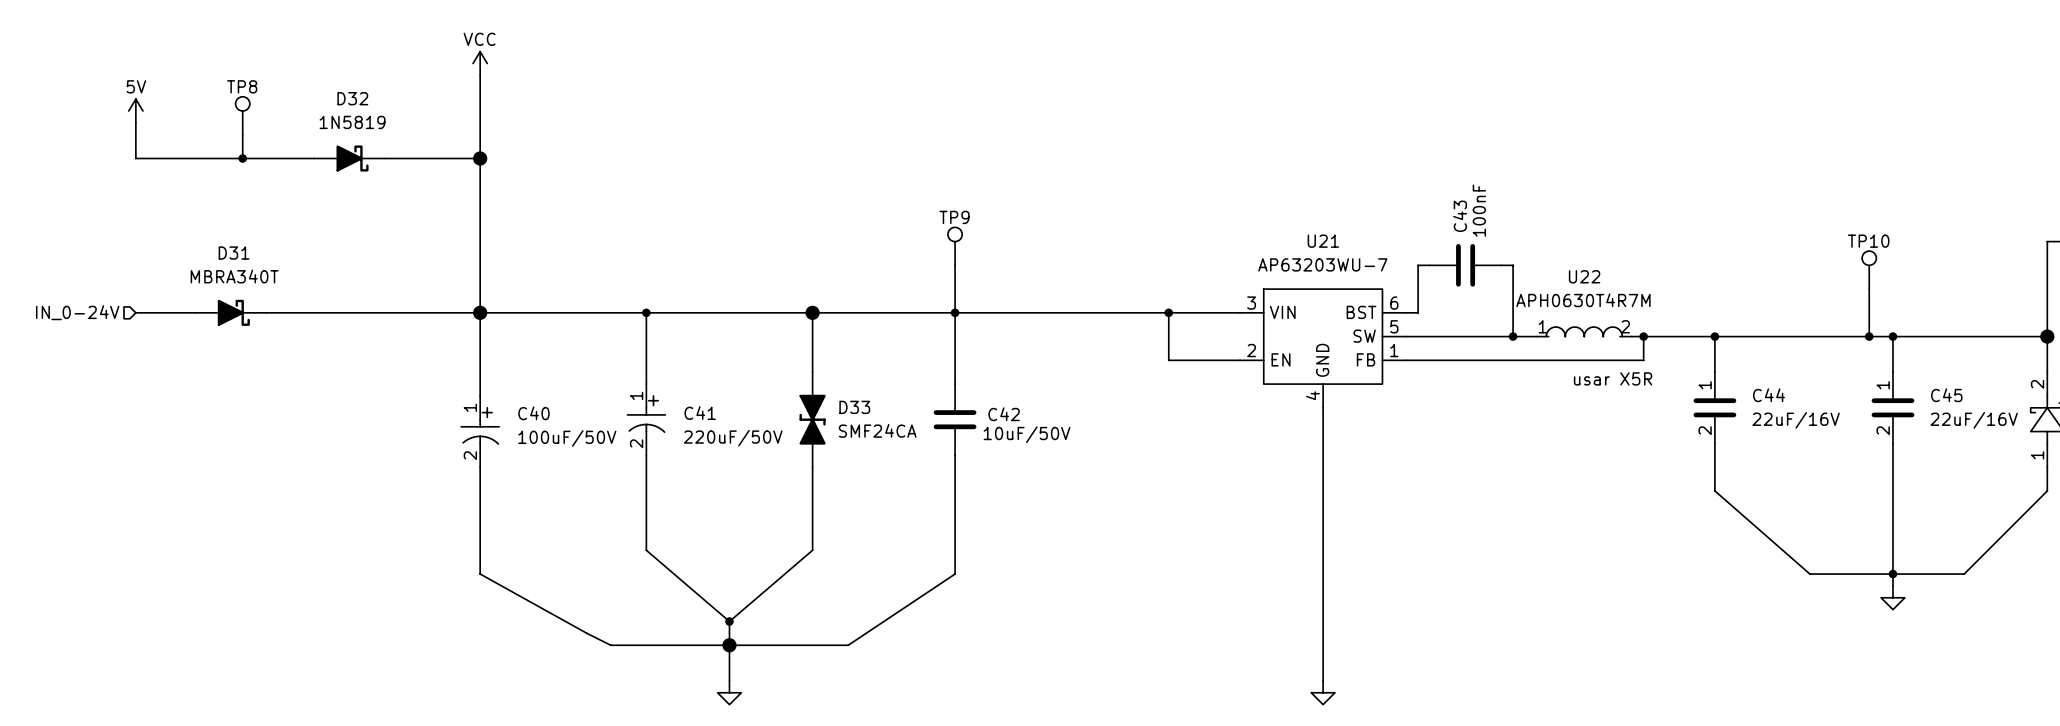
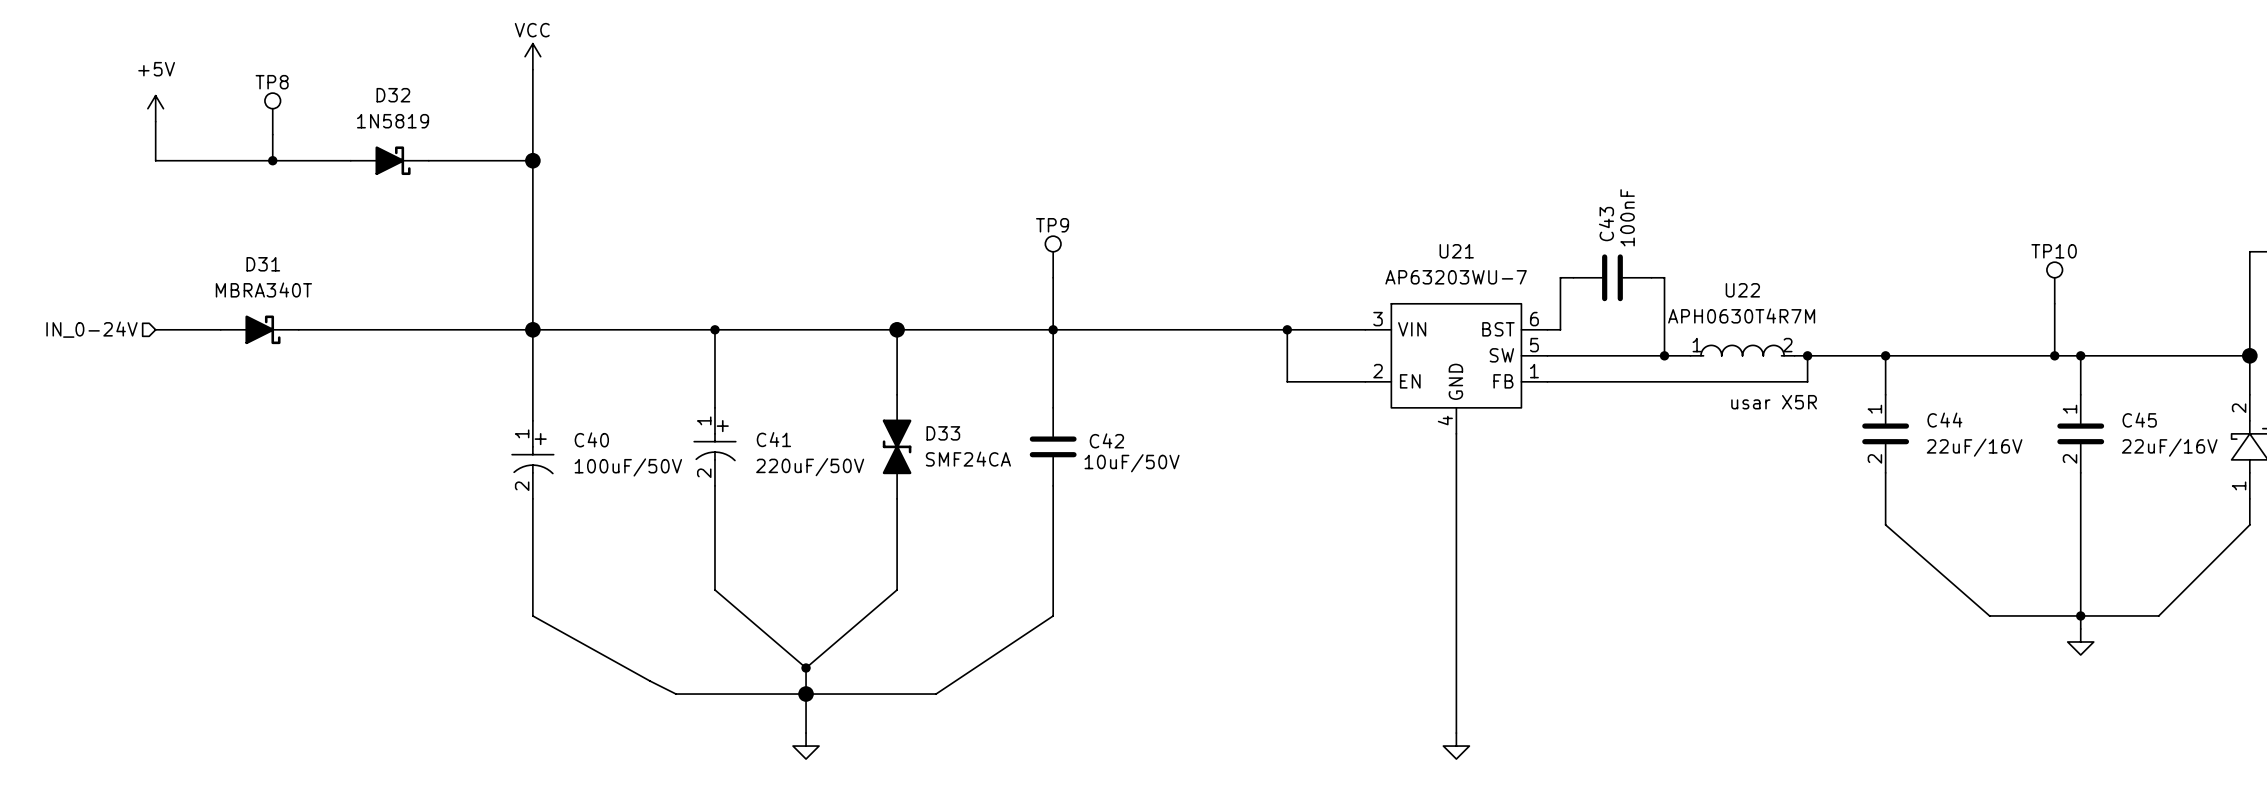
power symbol: 5V (135, 111) -> +5V (155, 108)

